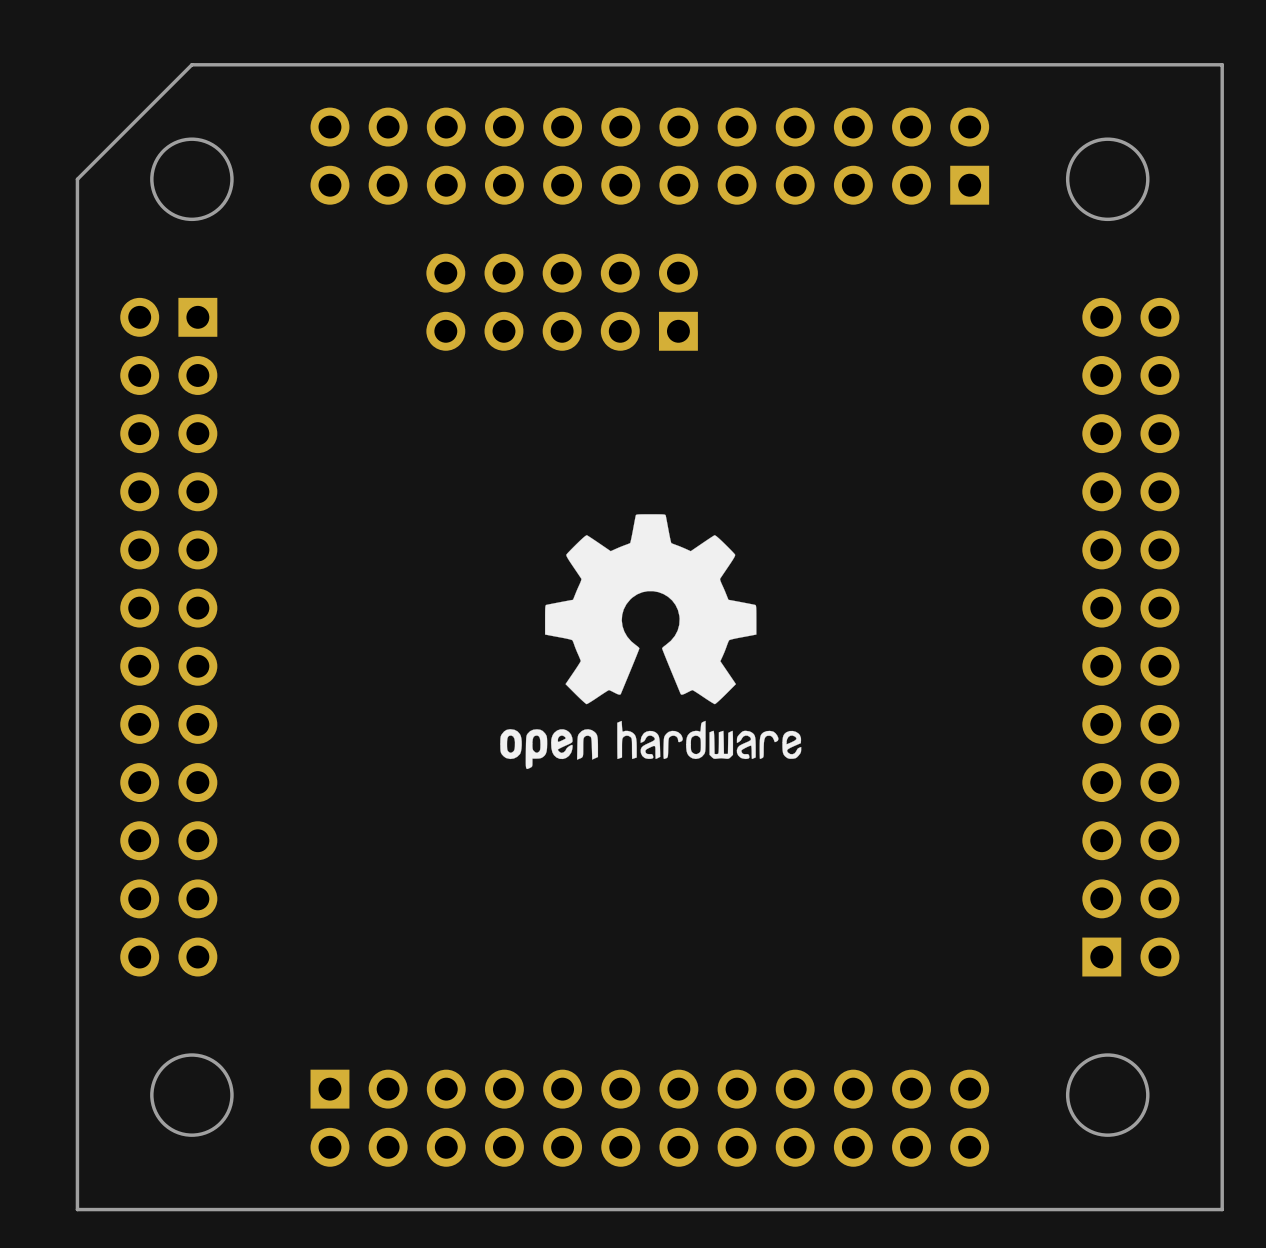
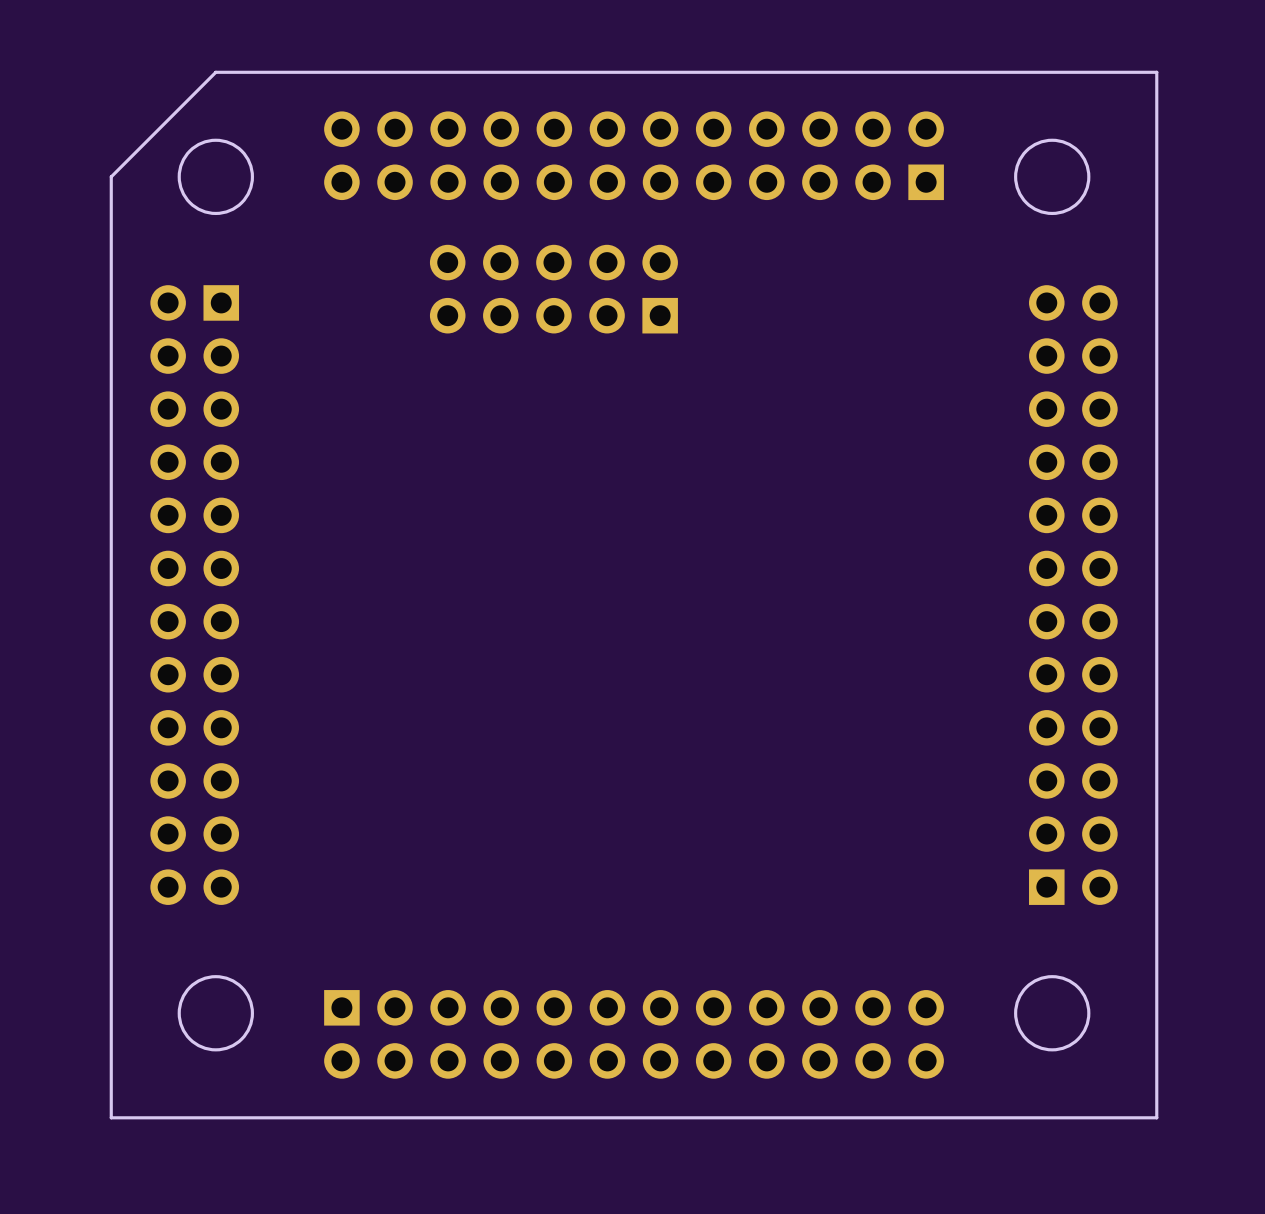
drawing: [500, 514, 802, 770] -> none

